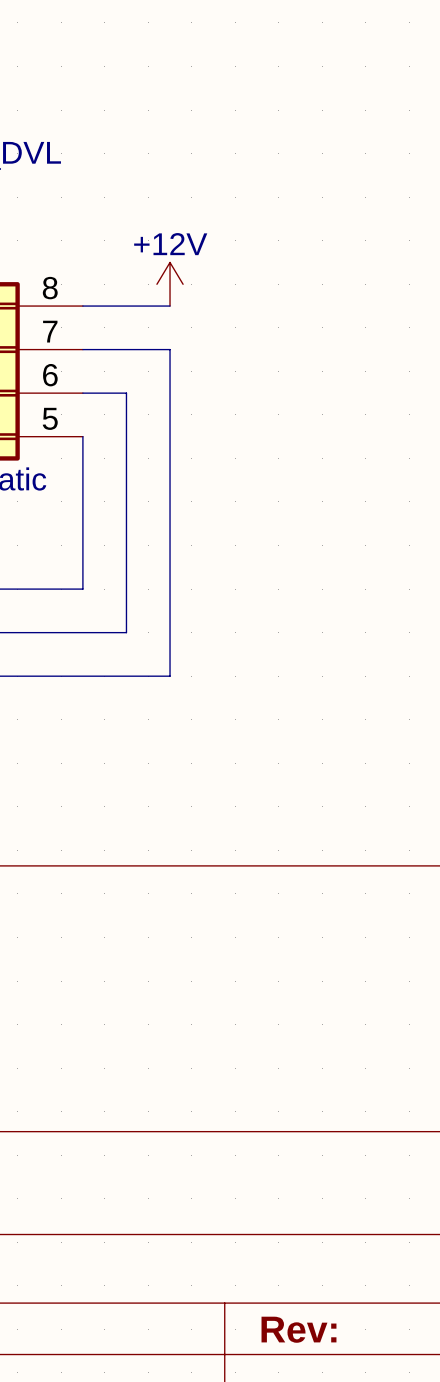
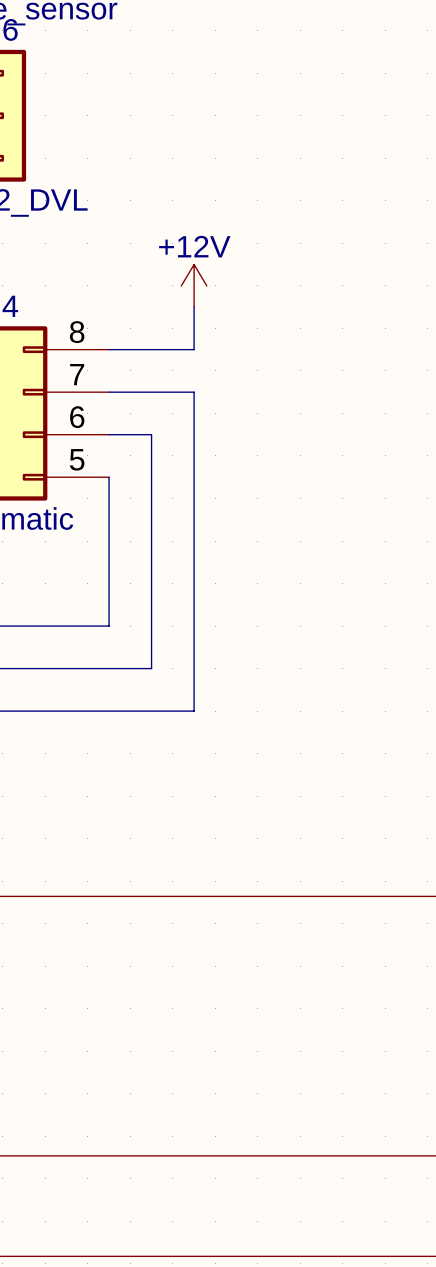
power symbol position: +12V (170, 284) -> +12V (194, 285)

